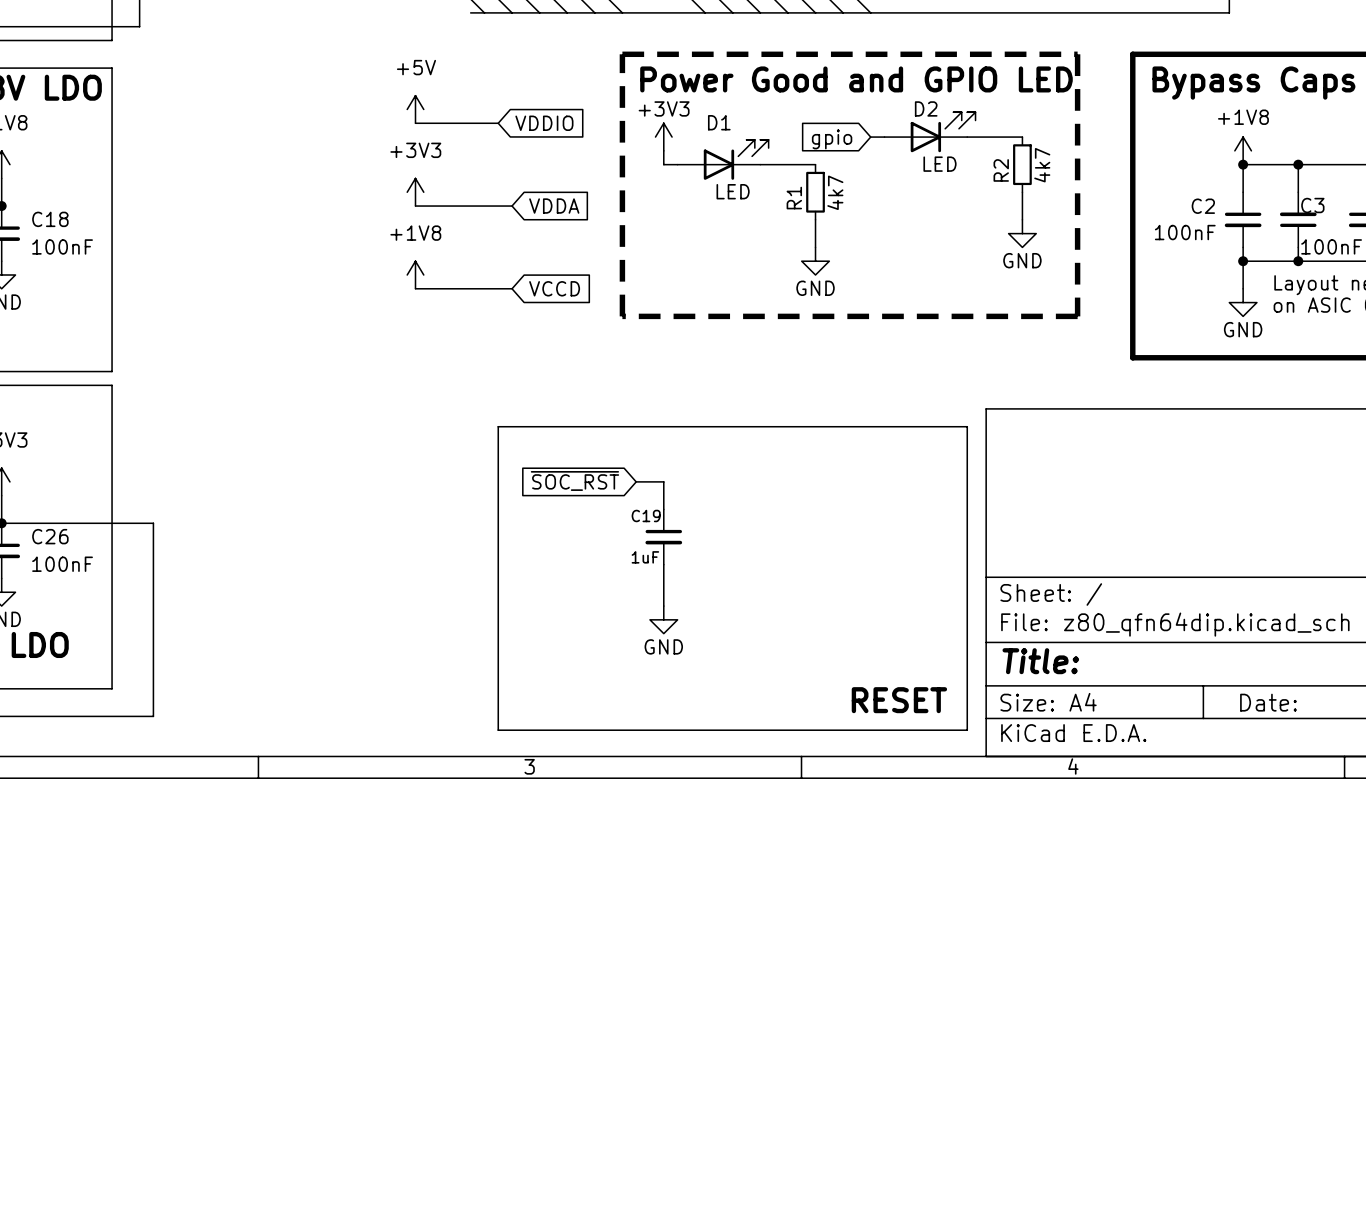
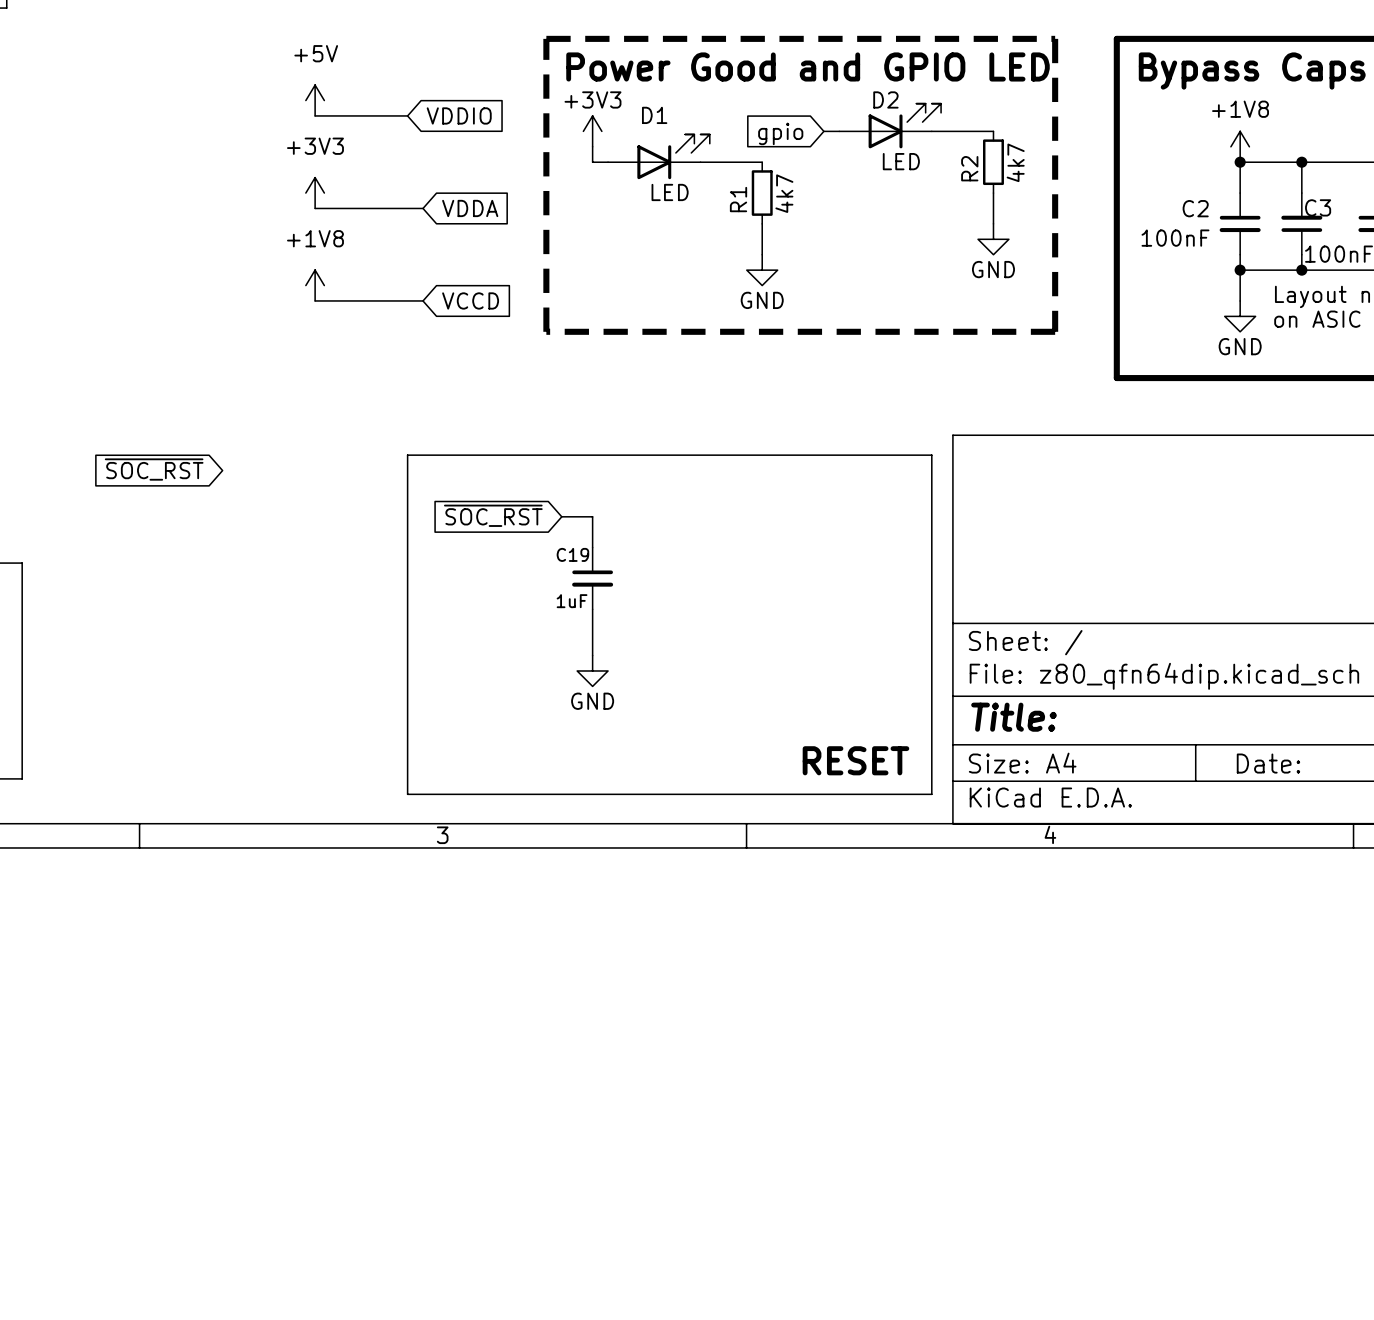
global label: none -> ~{SOC_RST} (154, 469)

